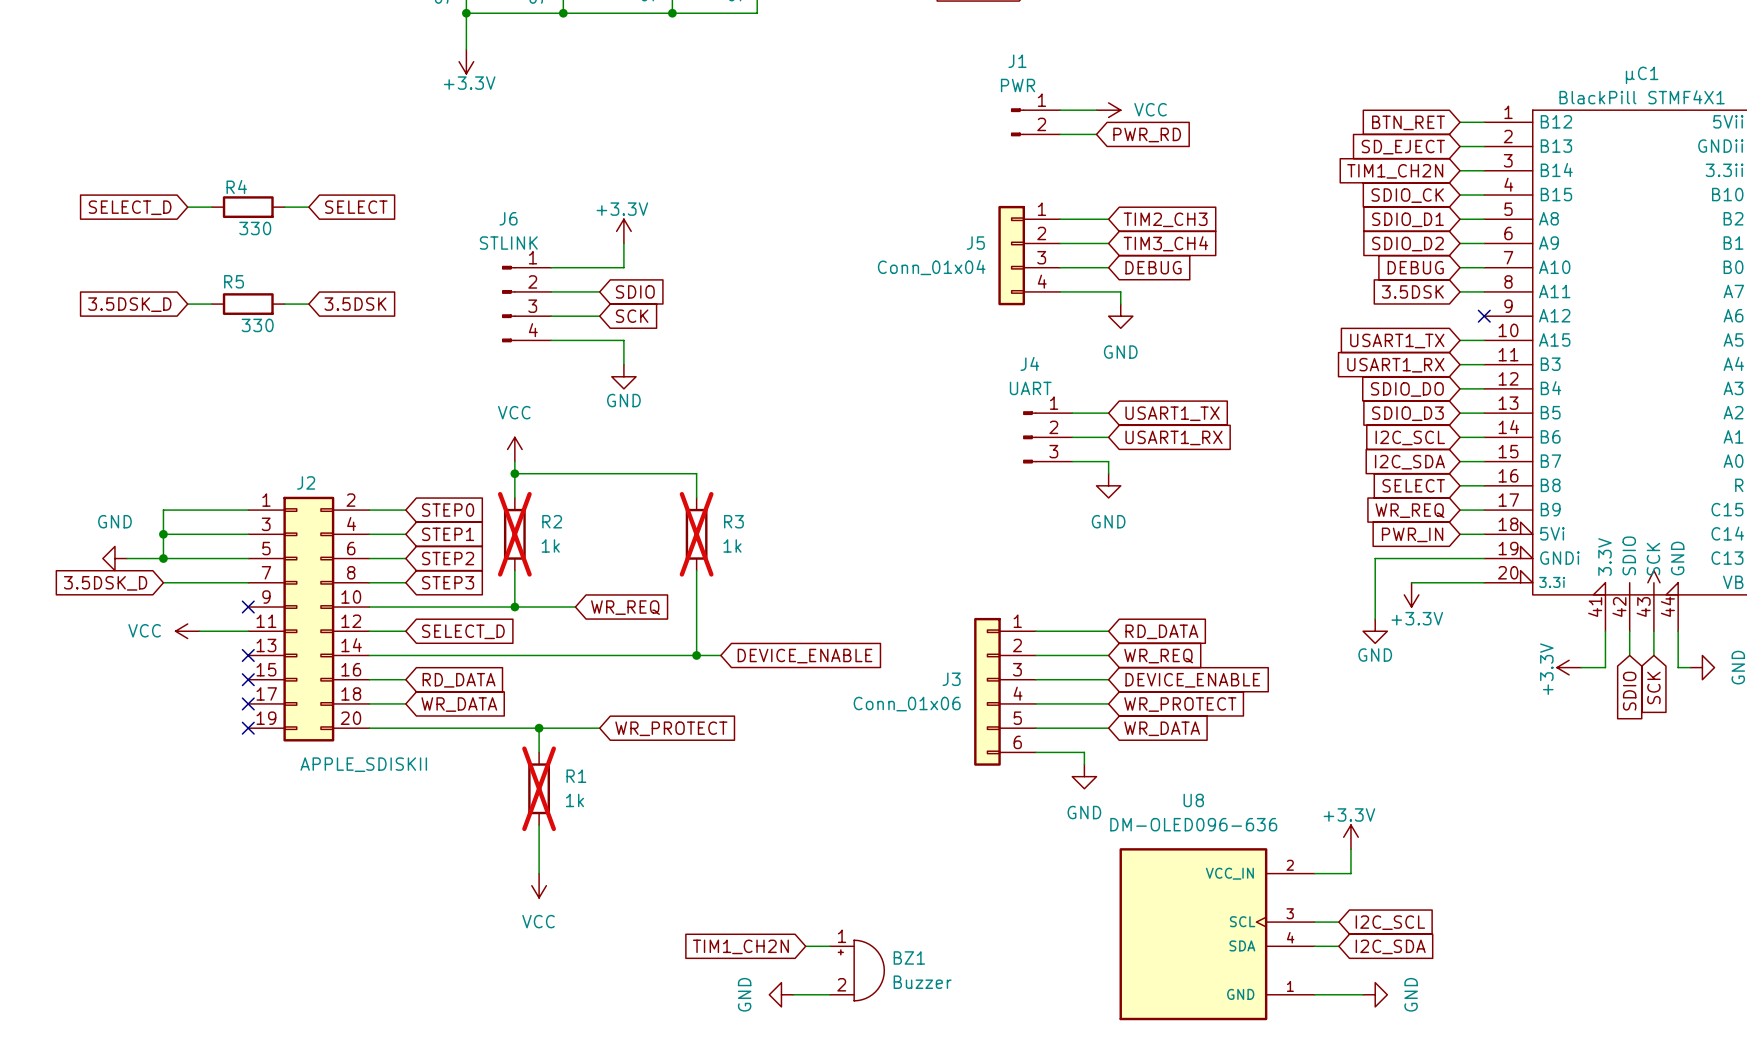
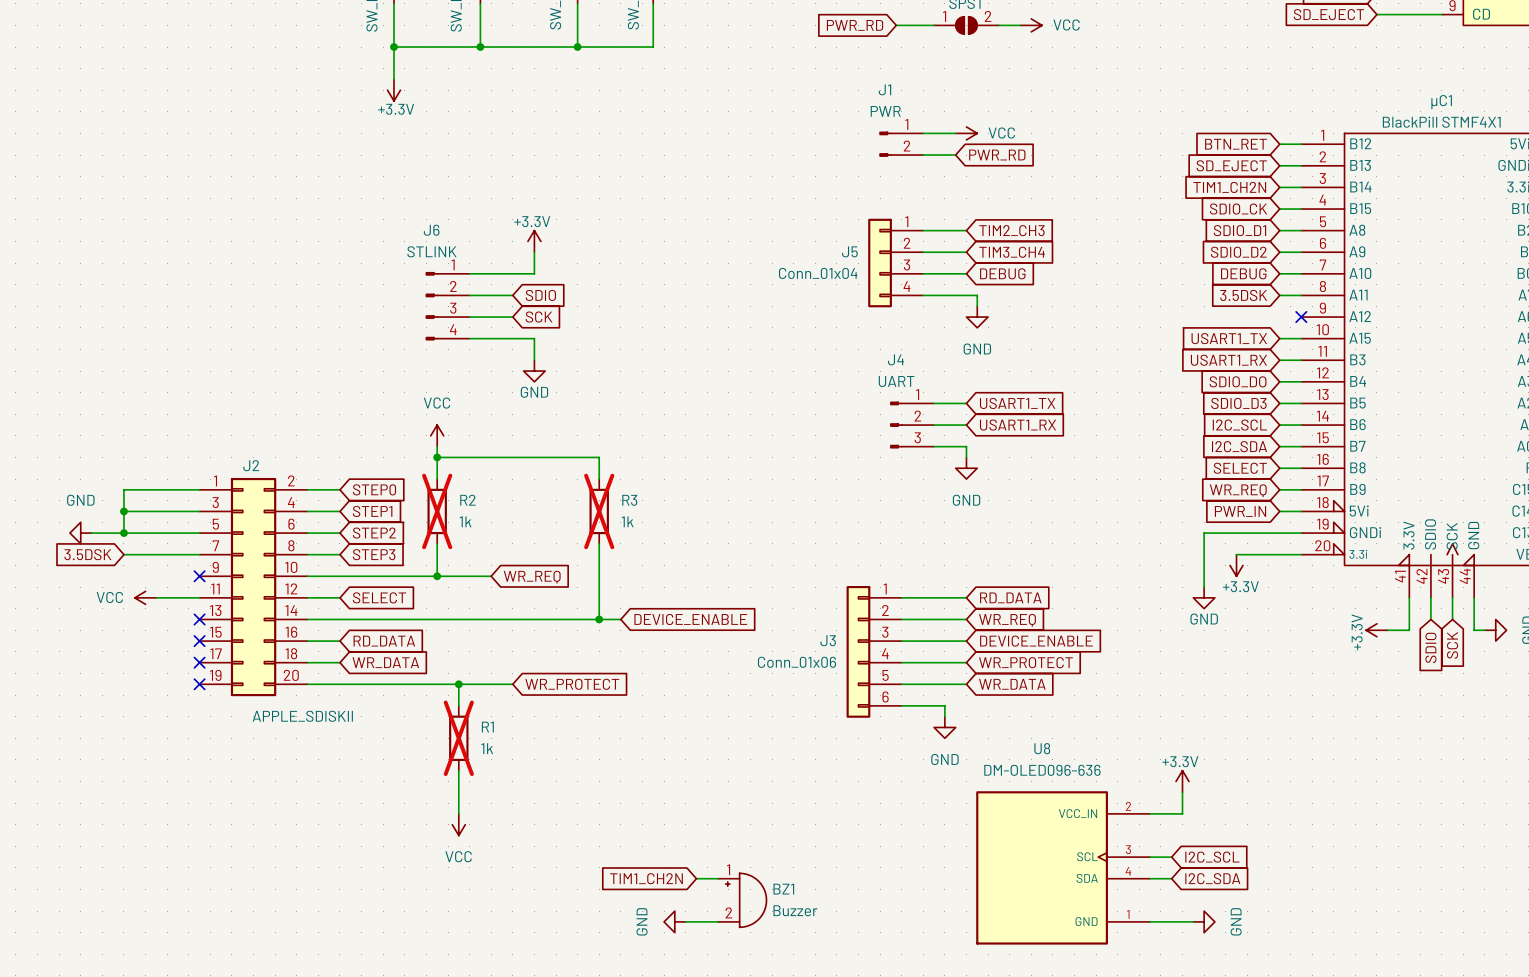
global label: SELECT_D (130, 207) -> none
wire: (187, 207) (211, 207) -> none
R4: 330 (248, 207) -> none
wire: (284, 207) (308, 207) -> none
global label: SELECT (356, 207) -> none
global label: 3.5DSK_D (129, 304) -> none
wire: (187, 304) (211, 304) -> none
R5: 330 (248, 304) -> none
wire: (284, 304) (308, 304) -> none
global label: 3.5DSK (355, 304) -> none
global label: 3.5DSK_D (105, 583) -> 3.5DSK (87, 554)
global label: SELECT_D (463, 631) -> SELECT (379, 597)

